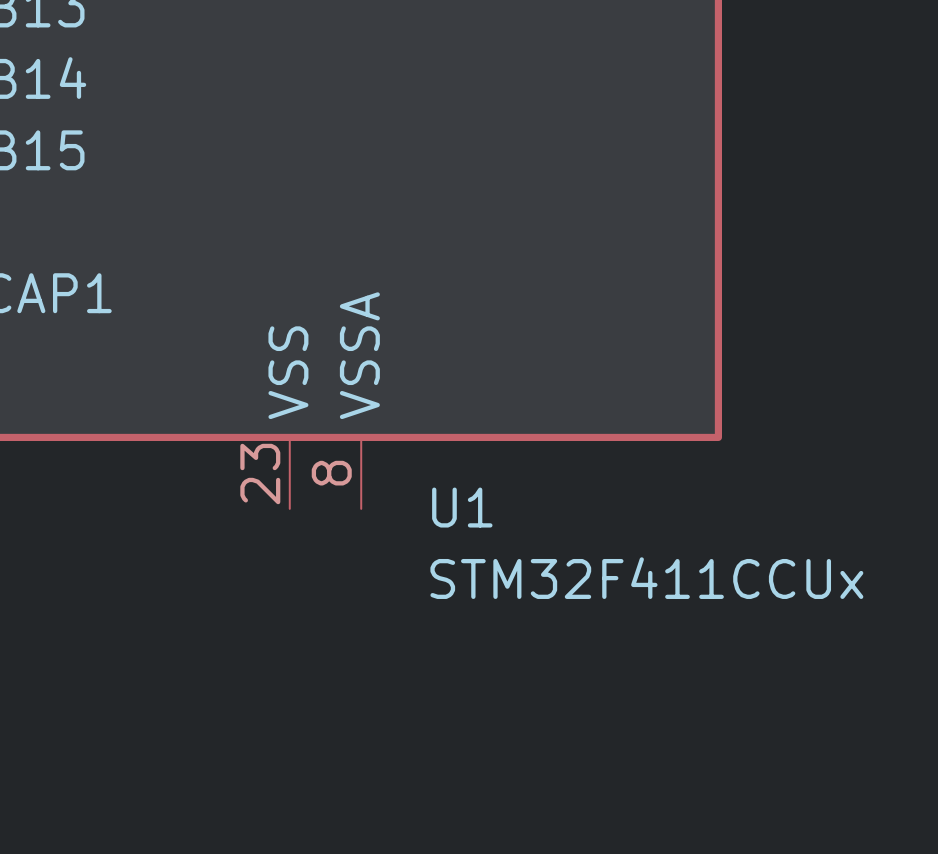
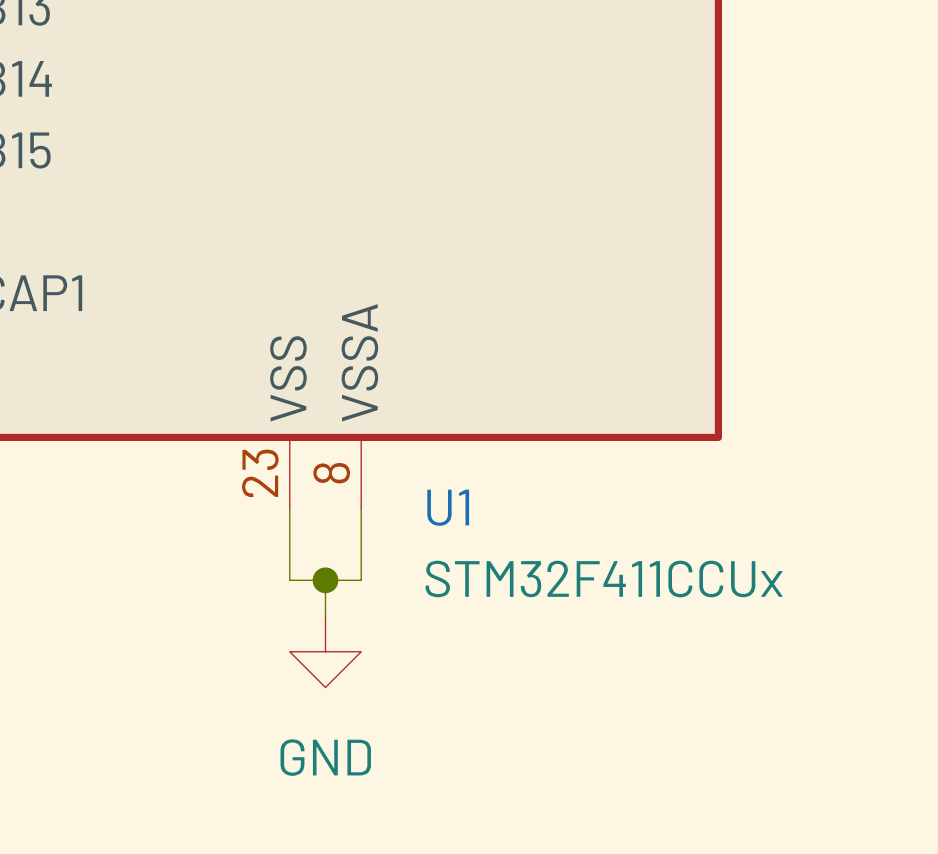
wire: none -> (289, 508) (289, 580) (361, 580) (361, 508)
wire: none -> (325, 580) (325, 616)
junction: none -> (325, 580)
power symbol: none -> GND (325, 651)

